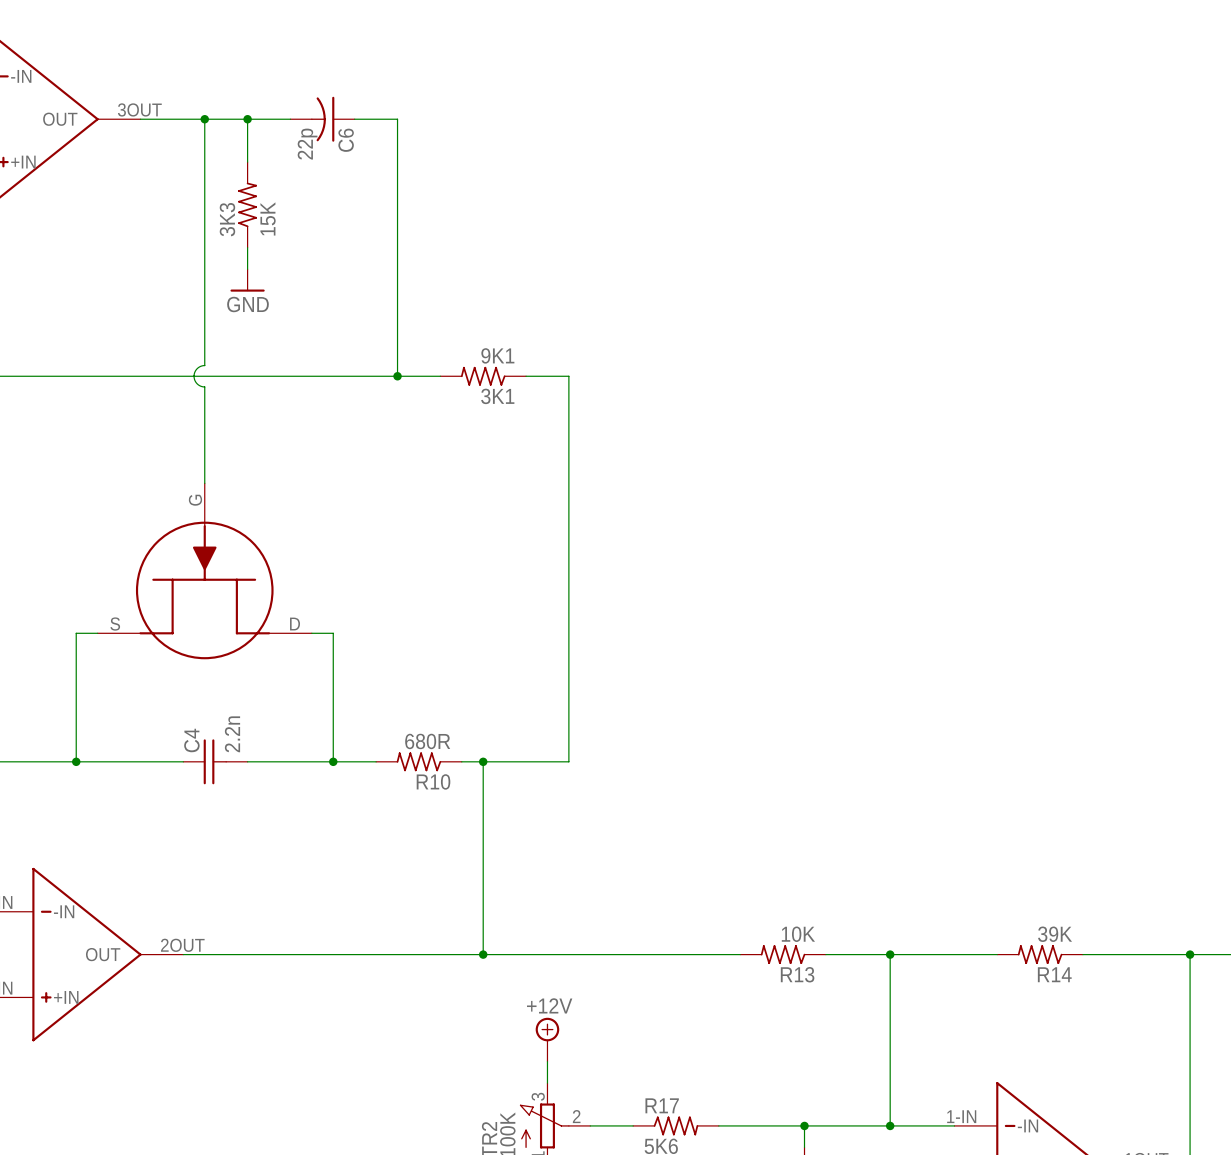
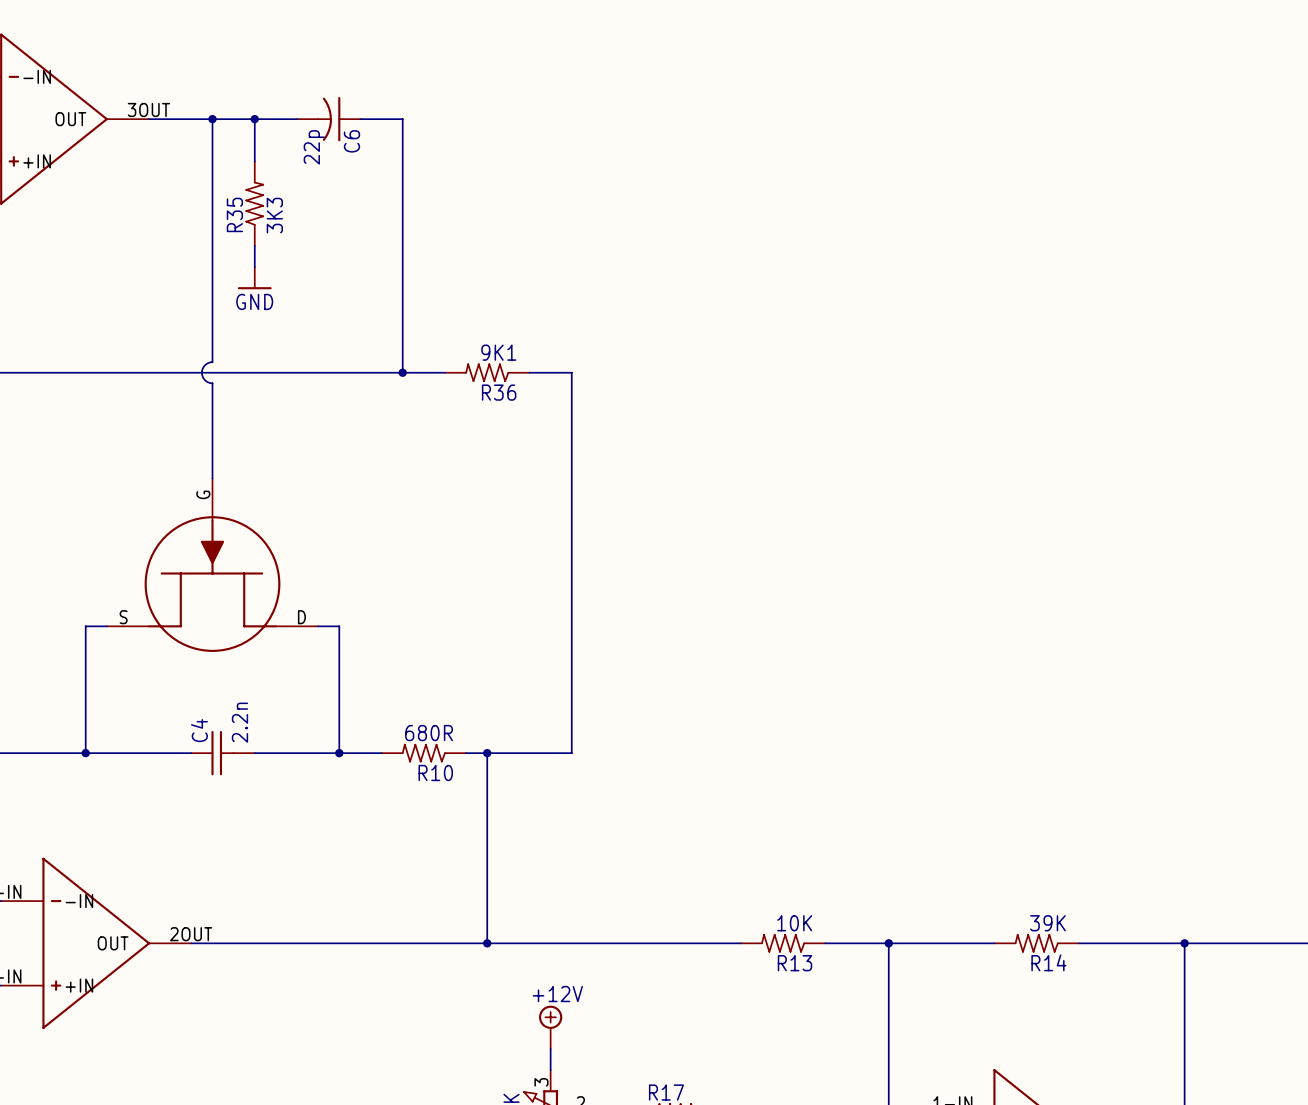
3K3 value: 15K (268, 218) -> 3K3 (274, 215)
3K3 name: 3K3 (227, 219) -> R35 (234, 214)
3K1 name: 3K1 (497, 396) -> R36 (499, 392)

